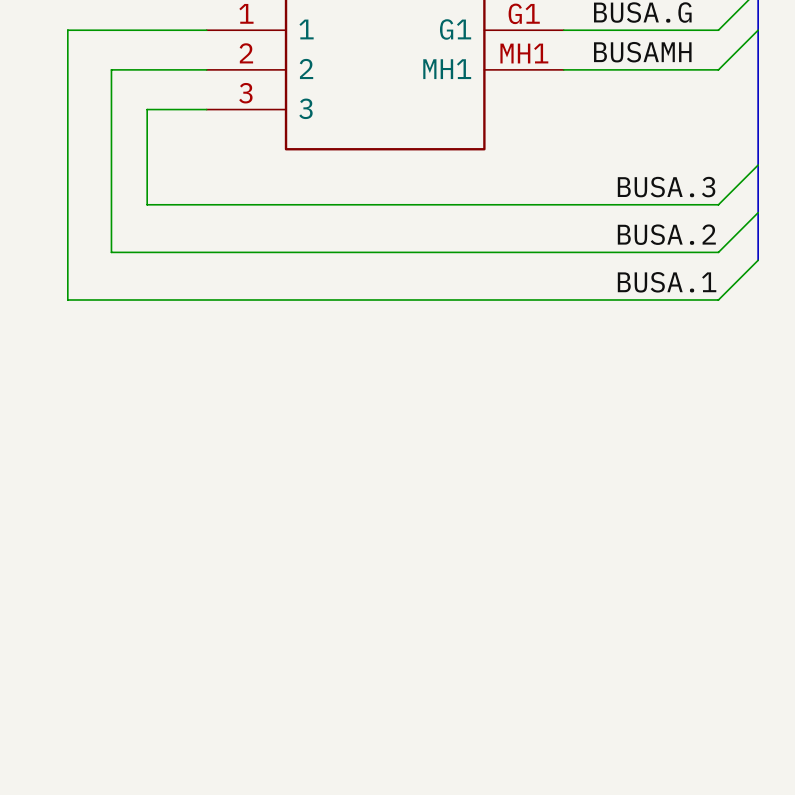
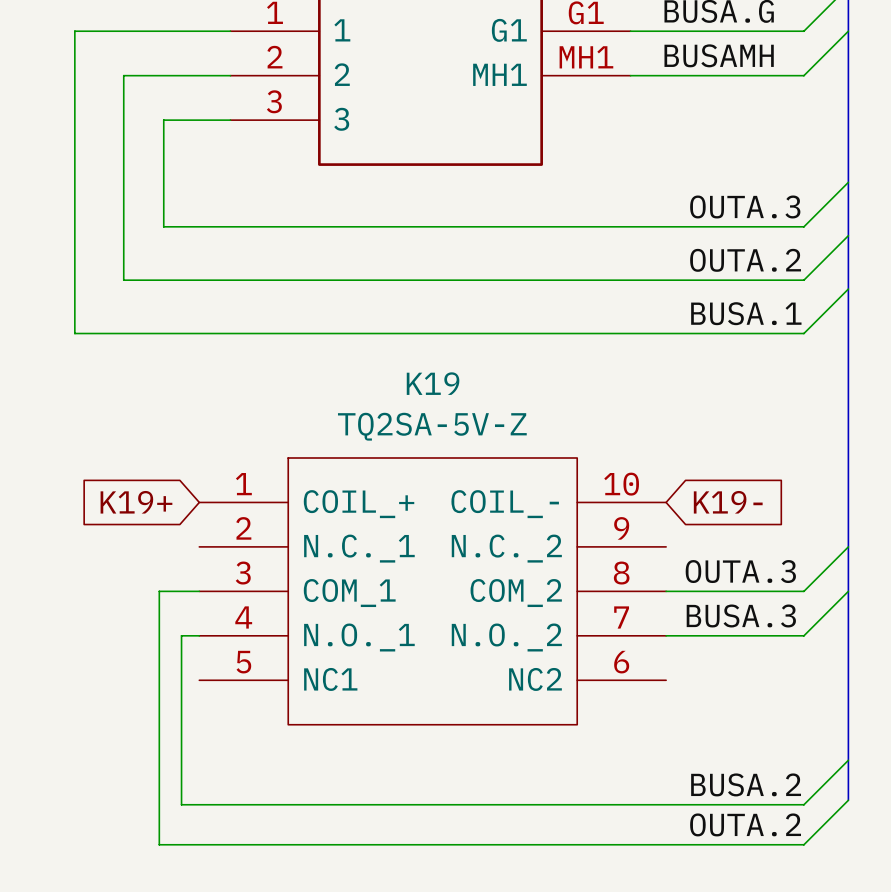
label: BUSA.3 (666, 187) -> OUTA.3 (745, 206)
label: BUSA.2 (666, 234) -> OUTA.2 (745, 260)
bus: none -> (848, 289) (848, 800)
global label: none -> K19+ (136, 502)
global label: none -> K19- (728, 502)
wire: none -> (848, 546) (803, 591) (666, 591)
label: none -> OUTA.3 (740, 571)
wire: none -> (199, 591) (159, 591) (159, 844) (803, 844) (848, 800)
K19: none -> TQ2SA-5V-Z (432, 591)
wire: none -> (848, 591) (803, 635) (666, 635)
label: none -> BUSA.3 (741, 615)
wire: none -> (199, 635) (181, 635) (181, 804) (803, 804) (848, 760)
label: none -> BUSA.2 (746, 784)
label: none -> OUTA.2 (745, 824)

